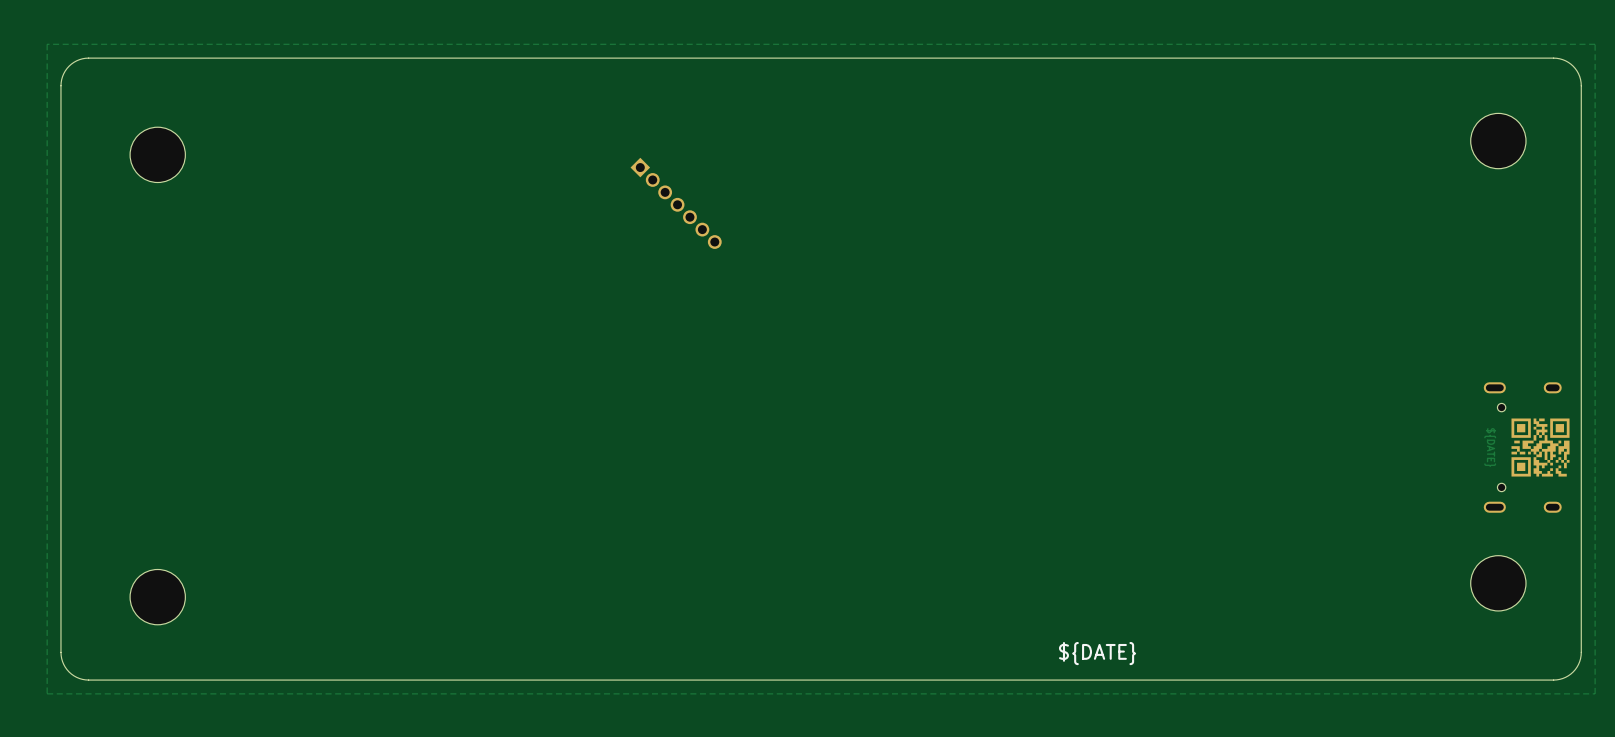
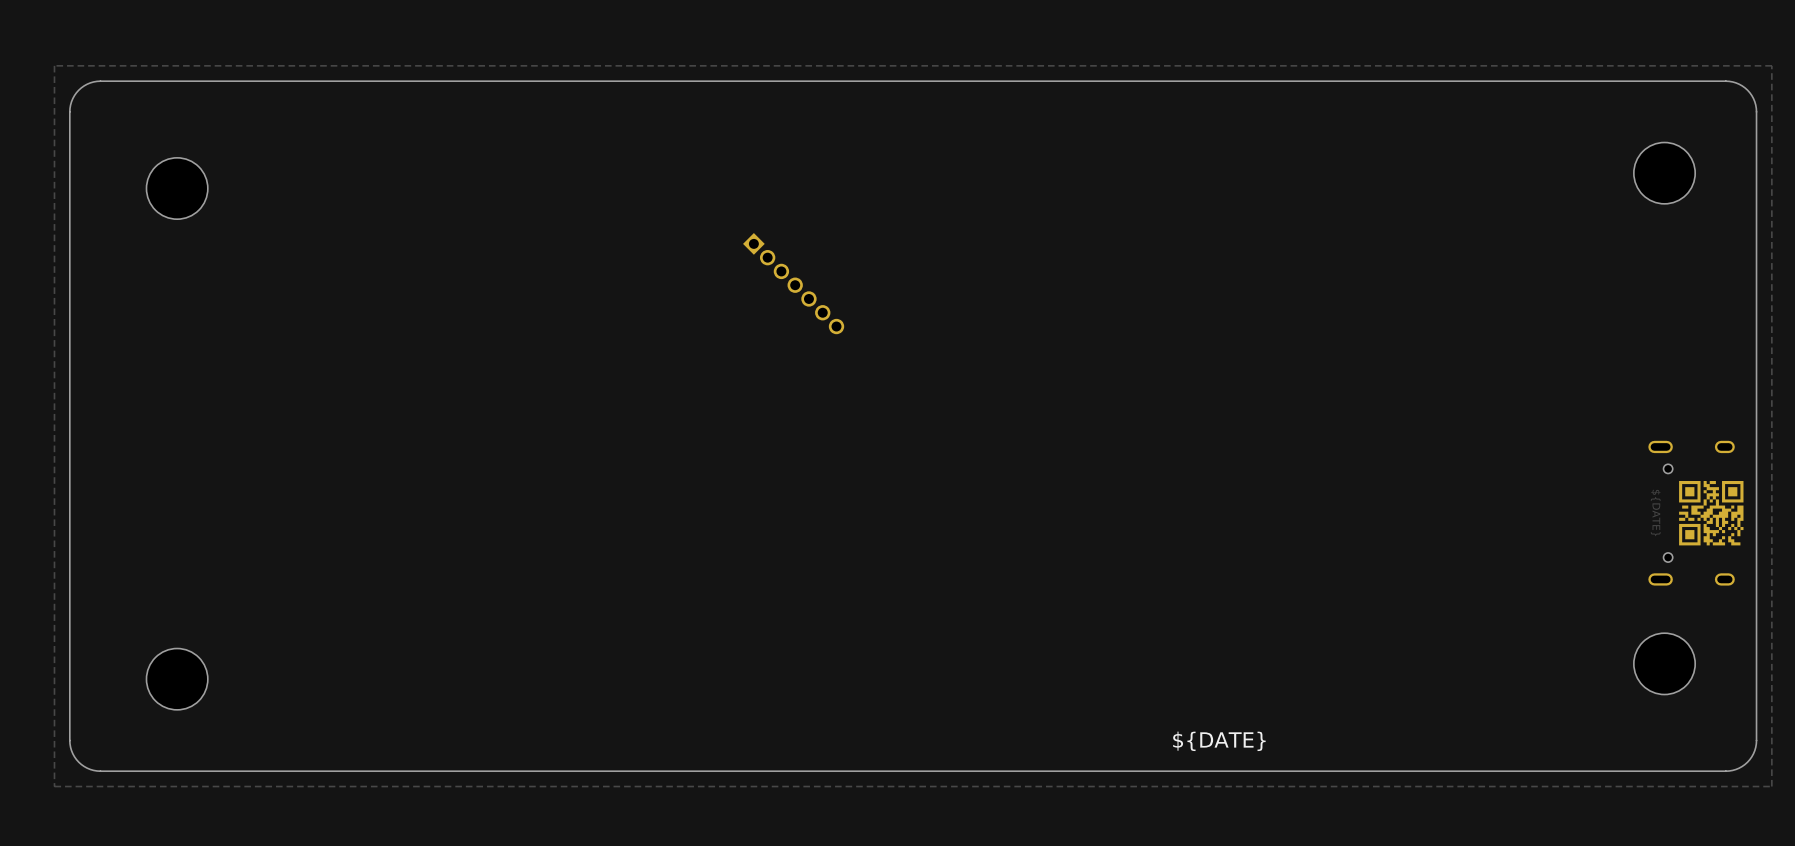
part position: (676, 203) -> (793, 283)

